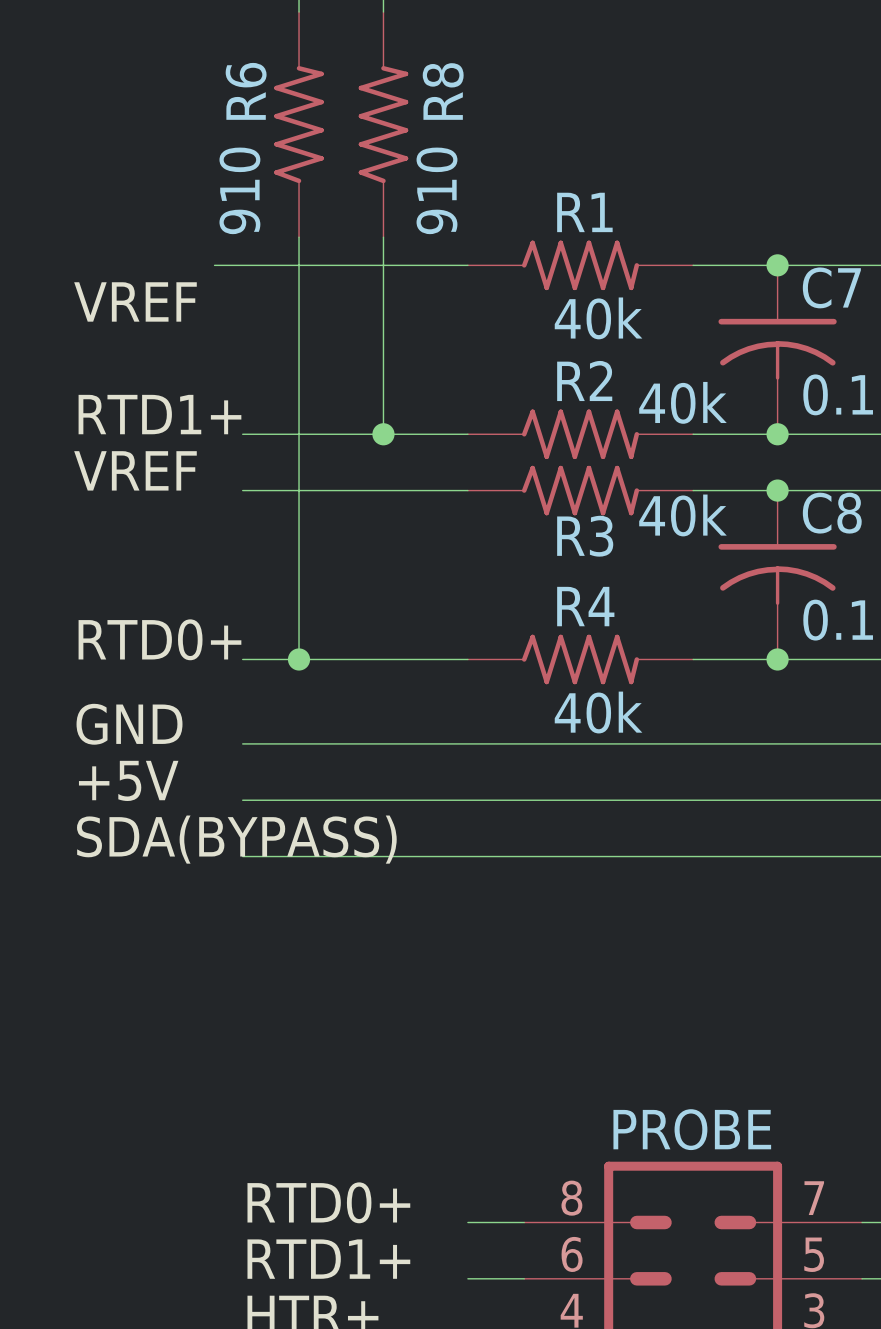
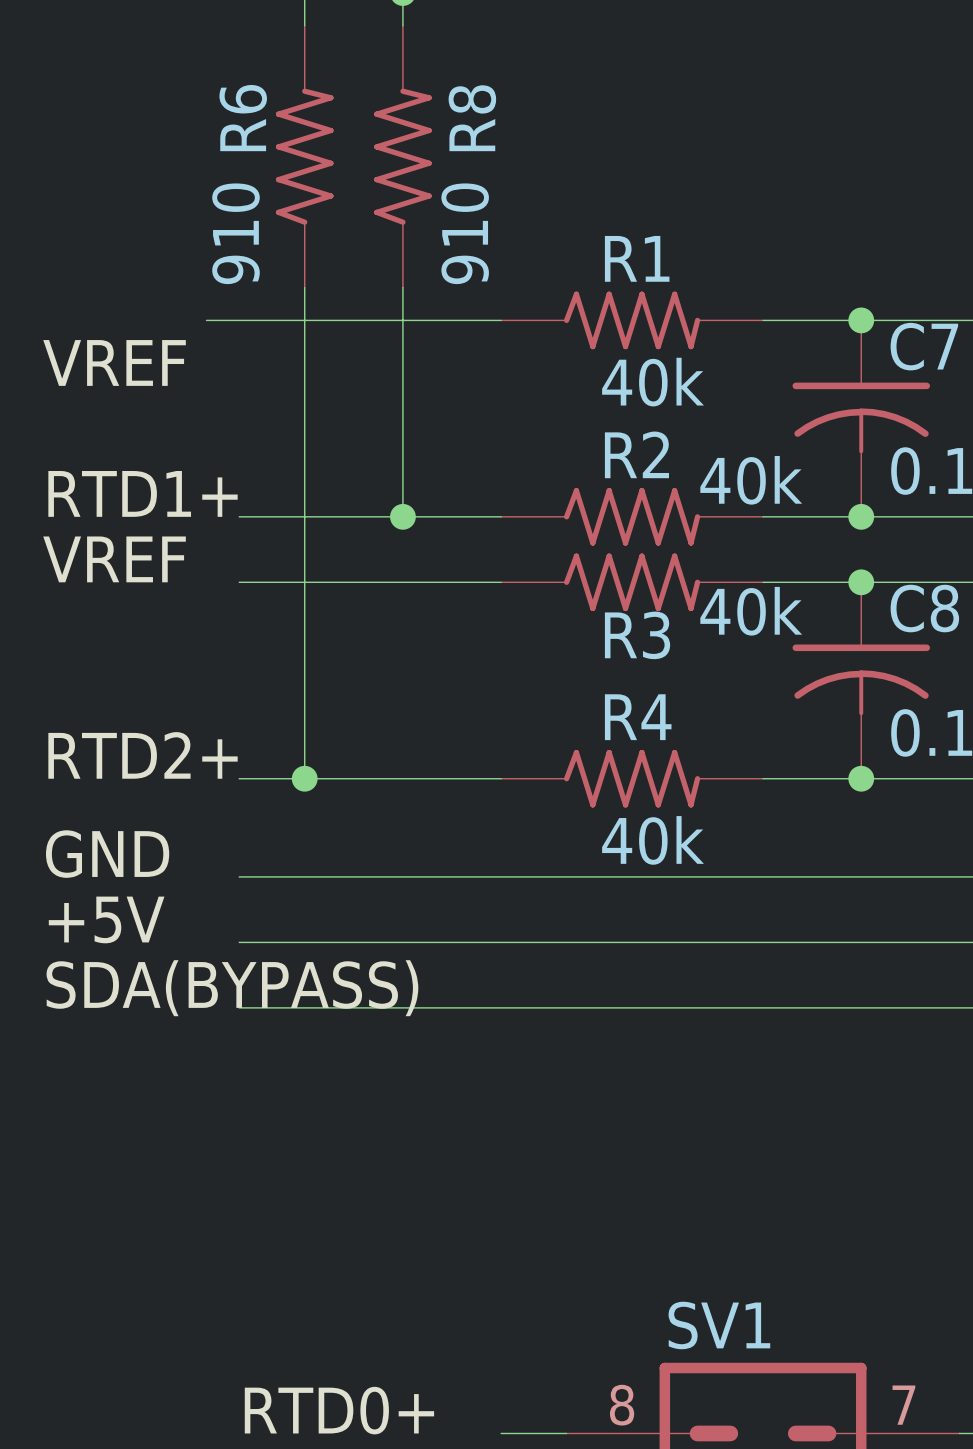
label: RTD0+ (159, 639) -> RTD2+ (143, 755)
PROBE name: PROBE (692, 1129) -> SV1 (719, 1325)

